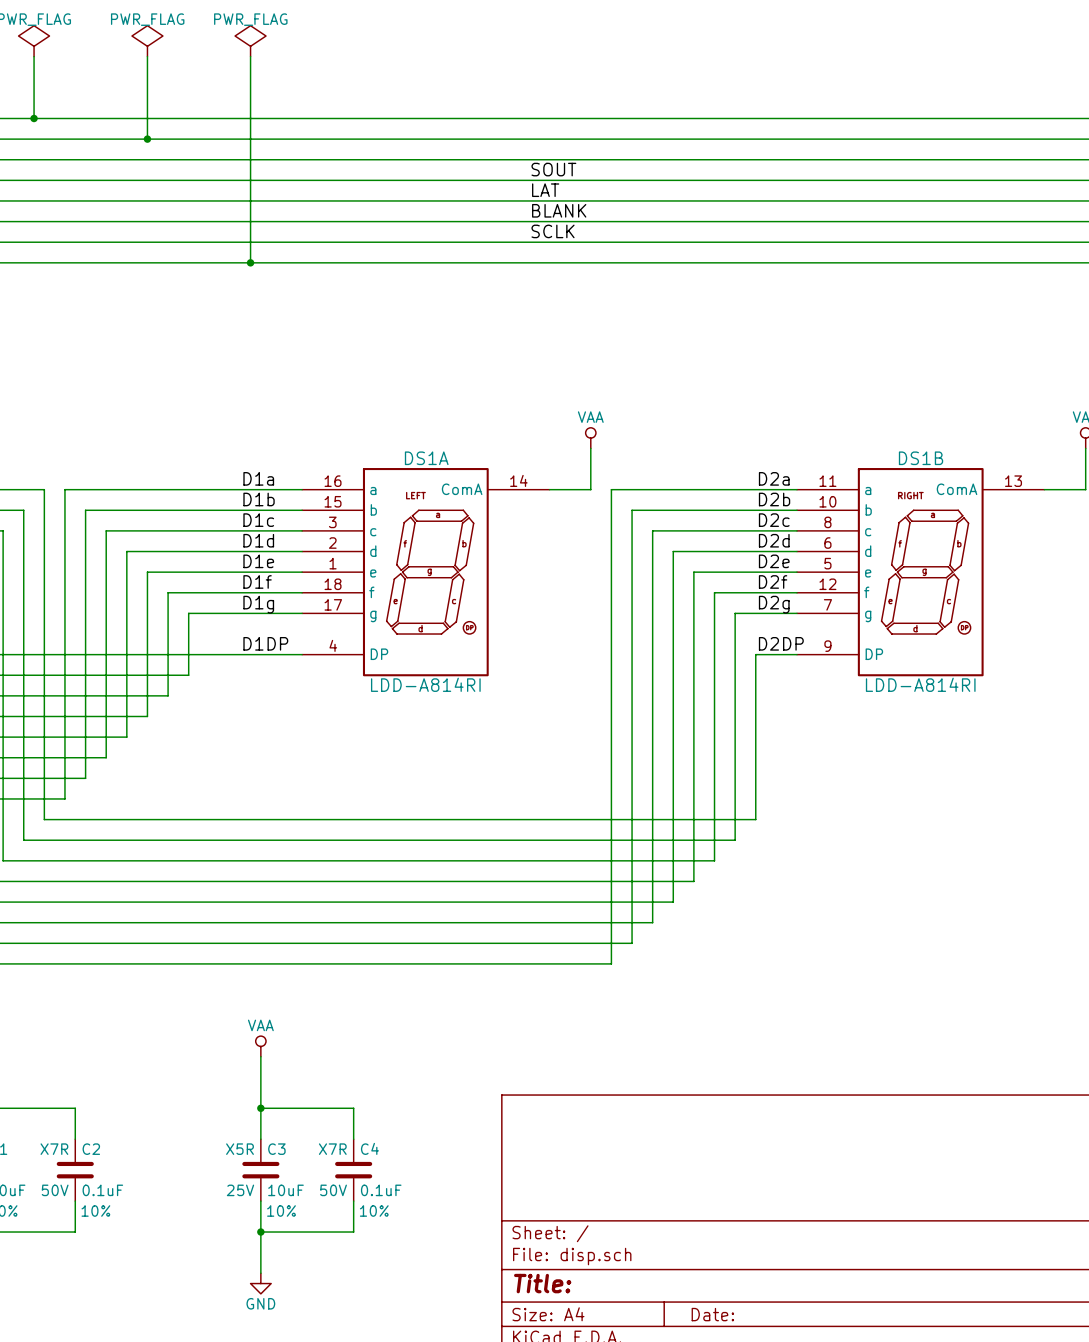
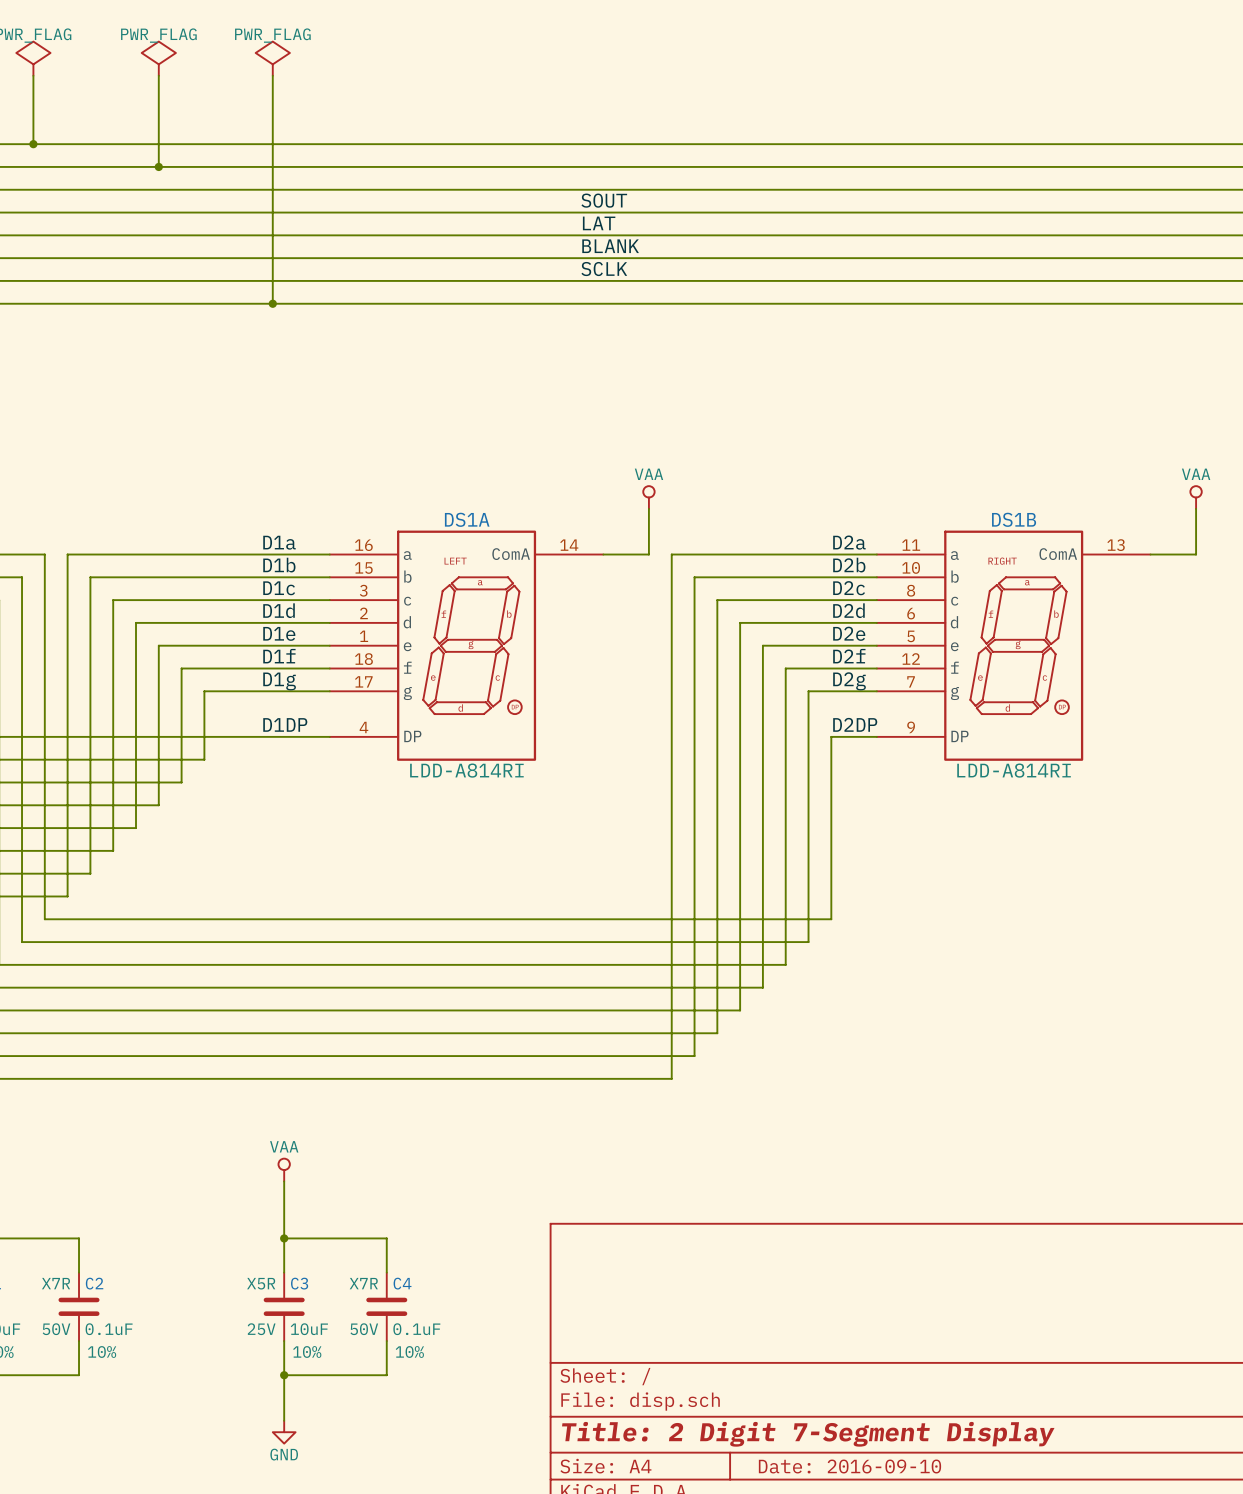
title block: Title: (542, 1283) -> Title: 2 Digit 7-Segment Display (808, 1434)
title block: Date: (712, 1314) -> Date: 2016-09-10 (849, 1466)

